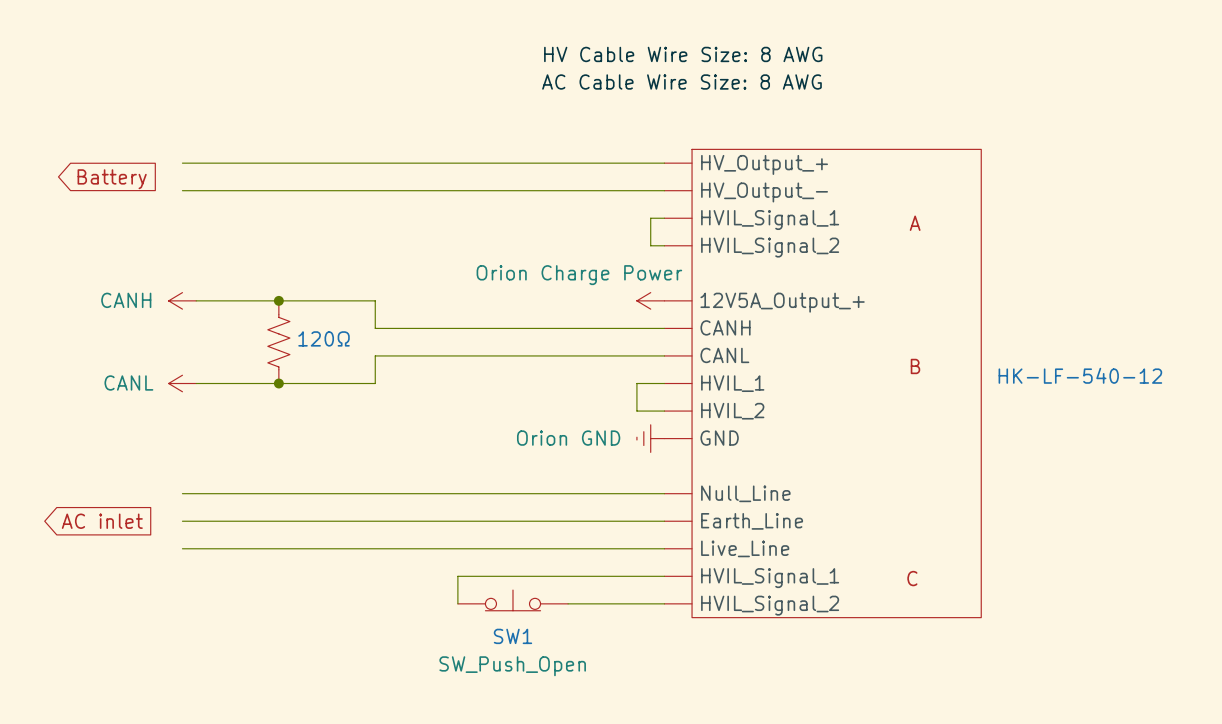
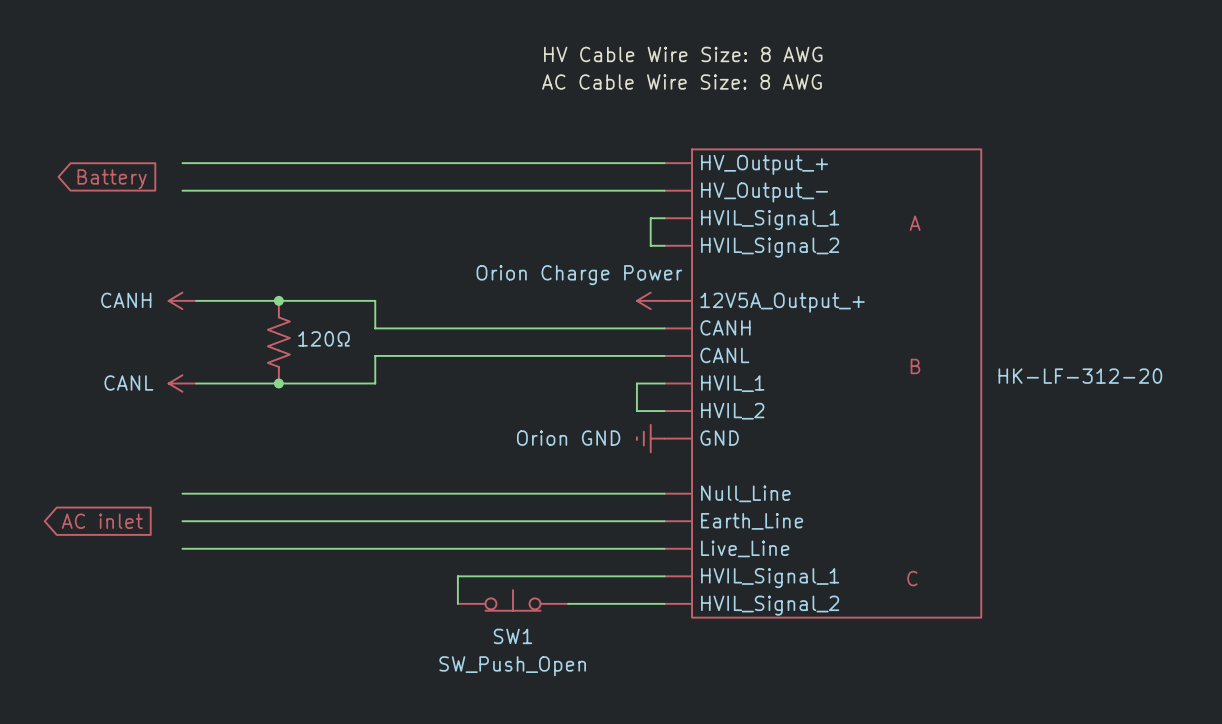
HK-LF-540-12 name: HK-LF-540-12 (1080, 375) -> HK-LF-312-20 (1080, 376)

